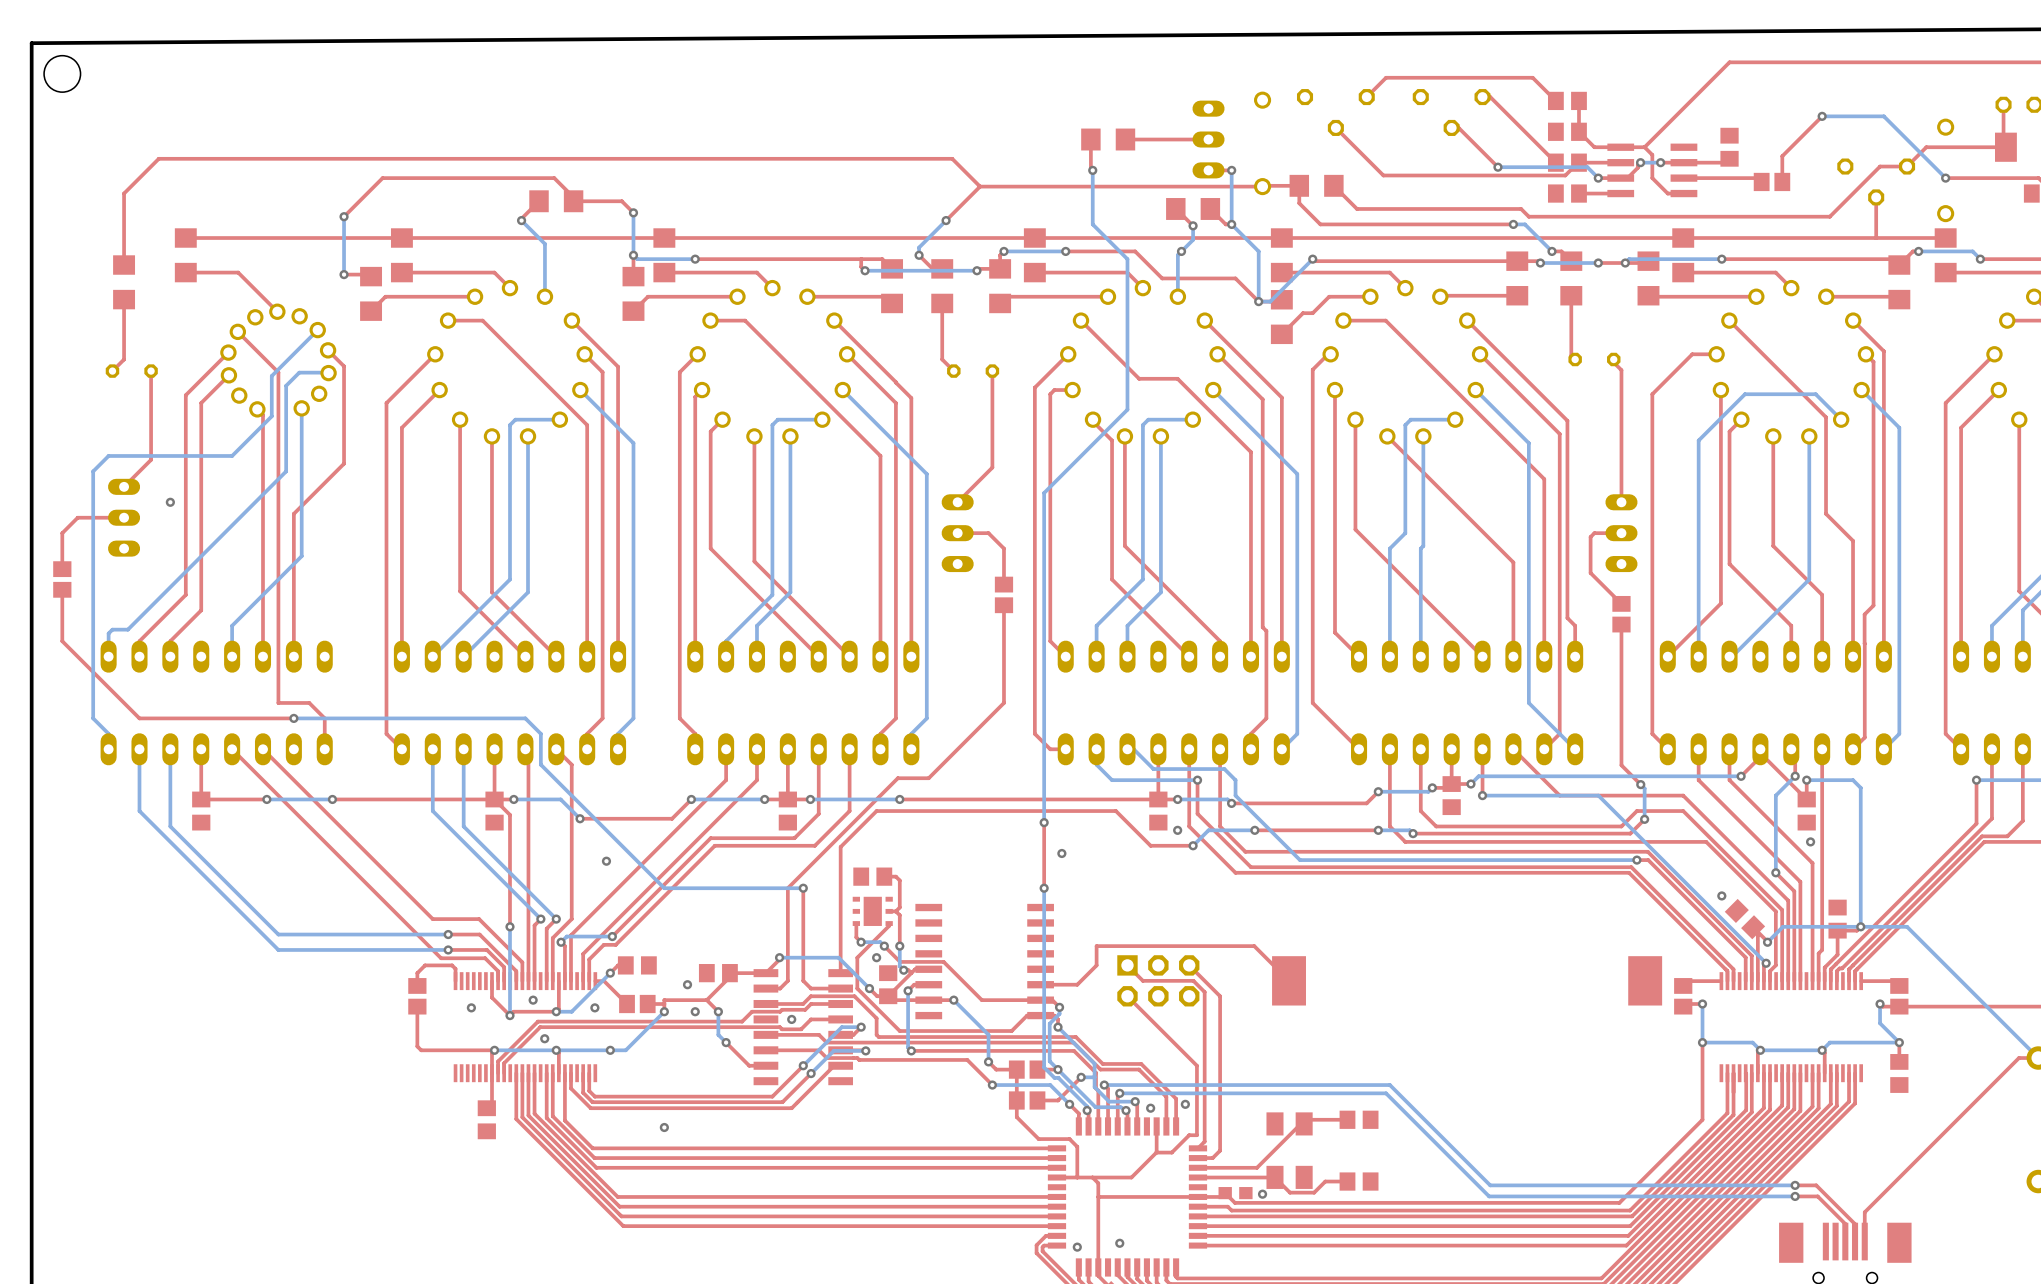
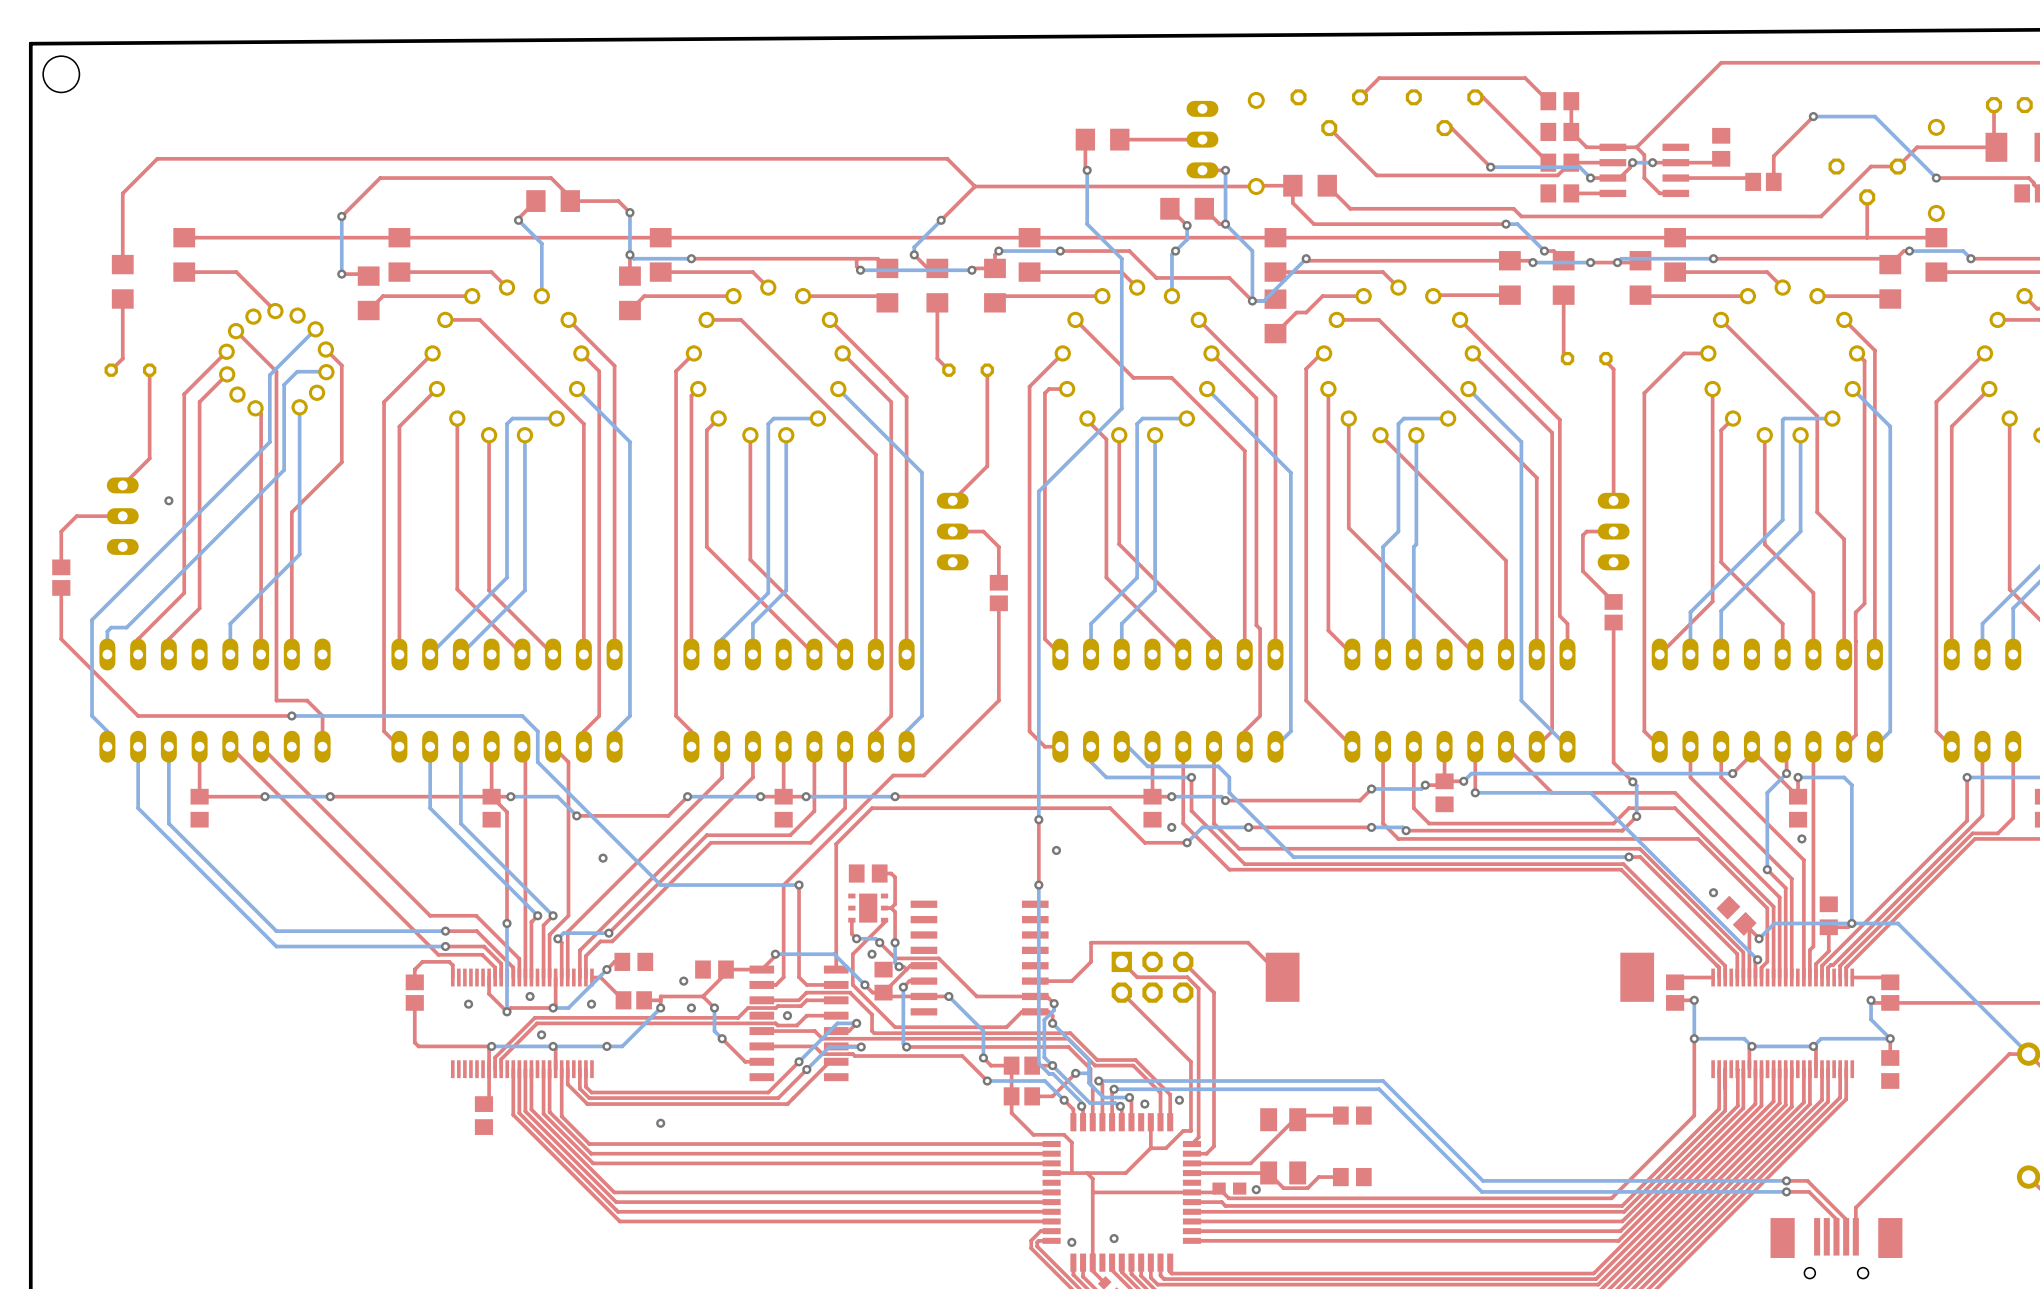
bottom track: (271, 416) (232, 455) (108, 455) (93, 471) (93, 621) -> (269, 415) (269, 442) (92, 619)
bottom track: (1841, 419) (1815, 394) (1744, 394) (1698, 440) (1698, 614) -> (1832, 418) (1784, 418) (1782, 420) (1782, 520) (1690, 612)
bottom track: (1809, 533) (1809, 579) (1732, 656) (1729, 656) -> (1800, 531) (1721, 610) (1721, 654)

